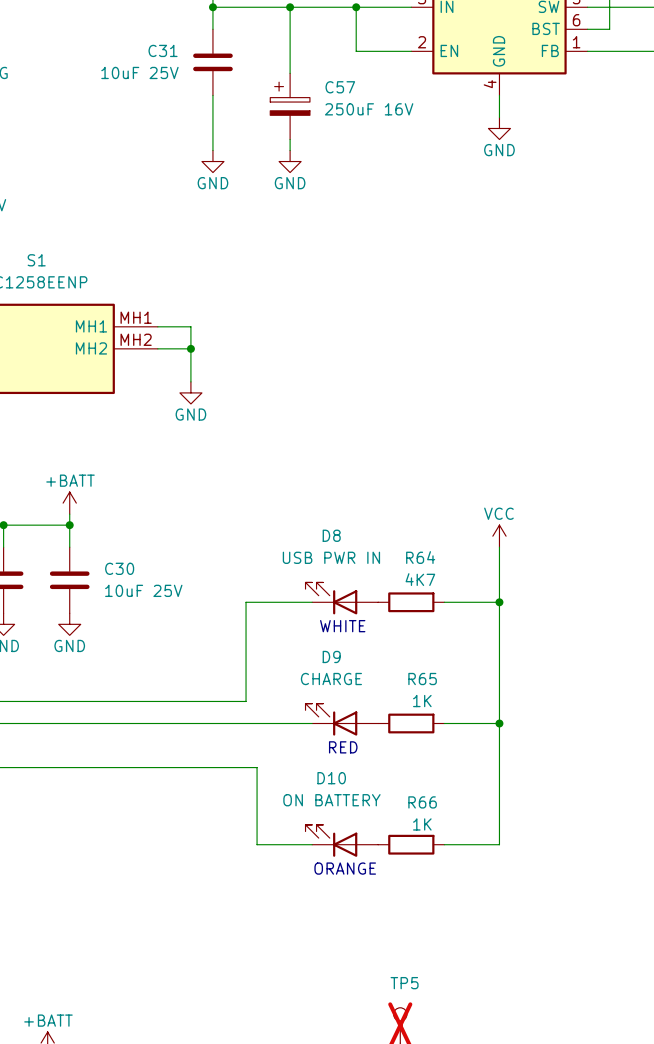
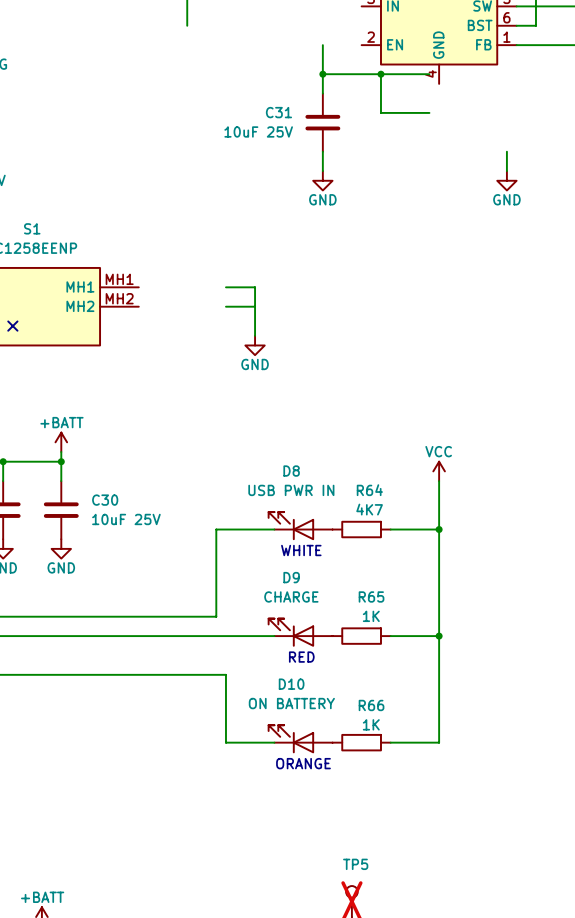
wire: (212, 7) (411, 7) -> none
junction: (212, 7) -> none
wire: (290, 7) (290, 73) -> none
junction: (290, 7) -> none
wire: (356, 7) (356, 51) (411, 51) -> (380, 74) (380, 112) (429, 112)
junction: (356, 7) -> none
C31 position: (212, 62) -> (322, 122)
wire: none -> (322, 74) (429, 74)
junction: none -> (322, 74)
junction: none -> (380, 74)
wire: (212, 95) (212, 150) -> (322, 45) (322, 93)
wire: (499, 95) (499, 117) -> (506, 151) (506, 171)
C57: 250uF 16V (290, 106) -> none
power symbol: GND (499, 128) -> none
wire: (290, 139) (290, 150) -> none
power symbol: GND (212, 161) -> none
power symbol: GND (290, 161) -> none
wire: none -> (322, 151) (322, 171)
power symbol: none -> GND (322, 180)
power symbol: none -> GND (506, 180)
wire: (157, 326) (190, 326) (190, 381) -> (225, 287) (255, 287) (255, 335)
wire: (157, 348) (190, 348) -> (225, 306) (255, 306)
junction: (190, 348) -> none
no-connect mark: none -> (12, 326)
power symbol position: GND (190, 392) -> GND (255, 345)

